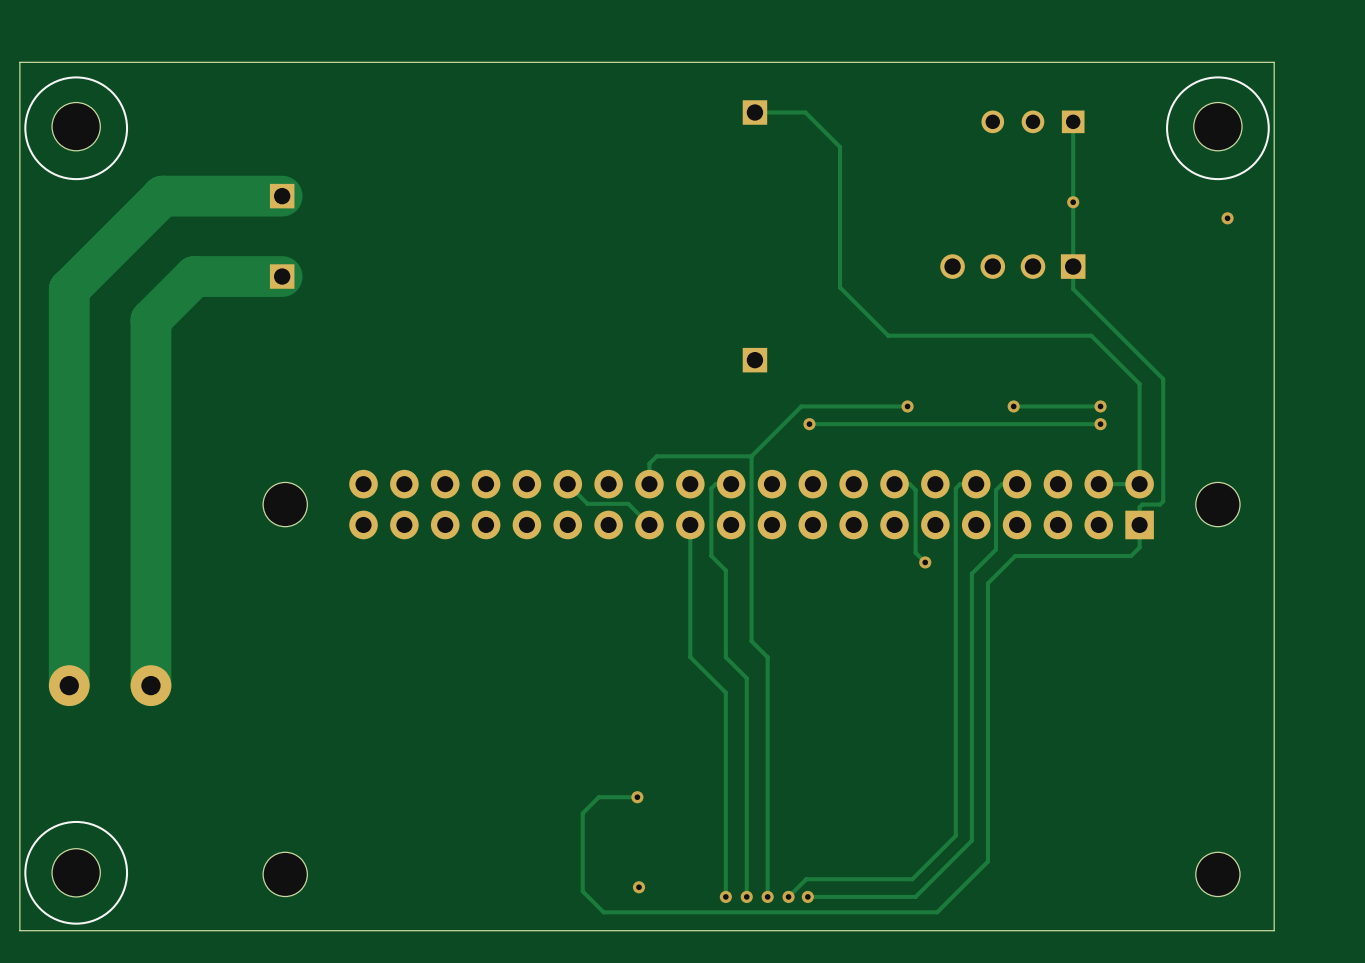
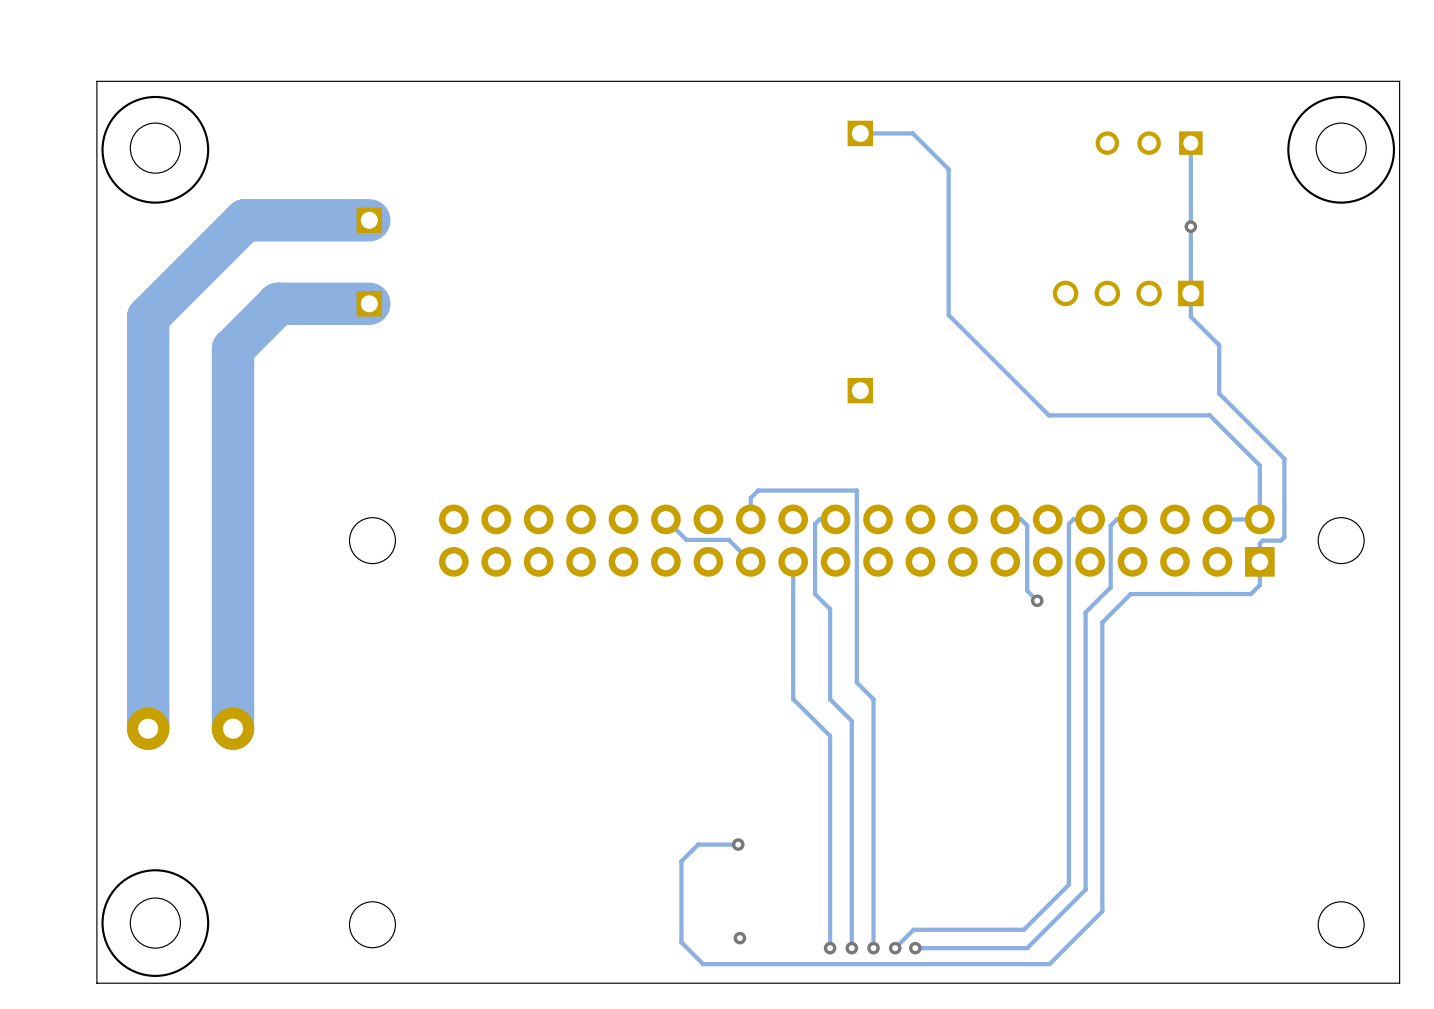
via: (1227, 218) -> none
track: (1100, 316) (1163, 379) (1163, 425) -> (1219, 345) (1219, 393) (1284, 458)
track: (888, 335) (1091, 335) (1139, 383) (1139, 432) -> (998, 365) (1048, 415) (1209, 415) (1259, 465)
track: (907, 406) (801, 406) (751, 456) -> none
via: (907, 406) -> none
via: (1013, 406) -> none
track: (1100, 406) (1013, 406) -> none
via: (1100, 406) -> none
via: (809, 424) -> none
track: (1100, 424) (809, 424) -> none
via: (1100, 424) -> none

